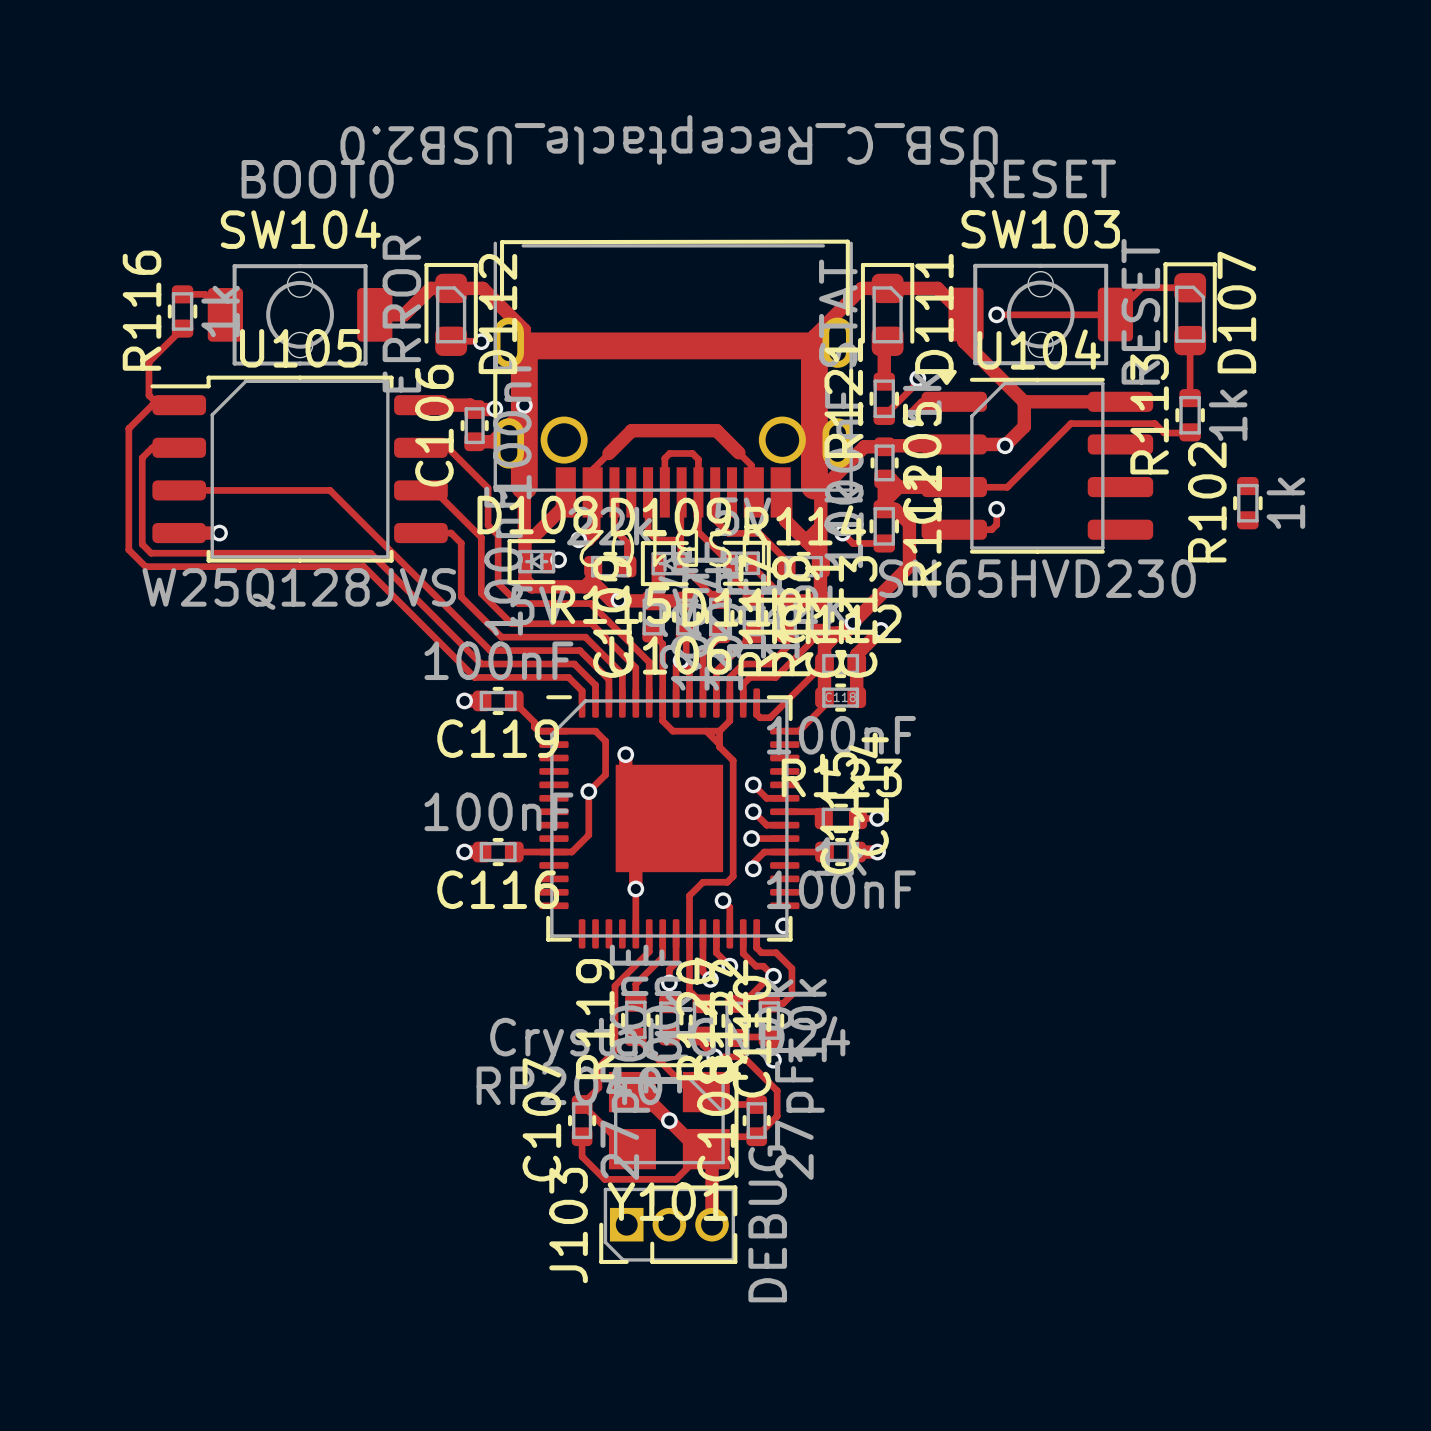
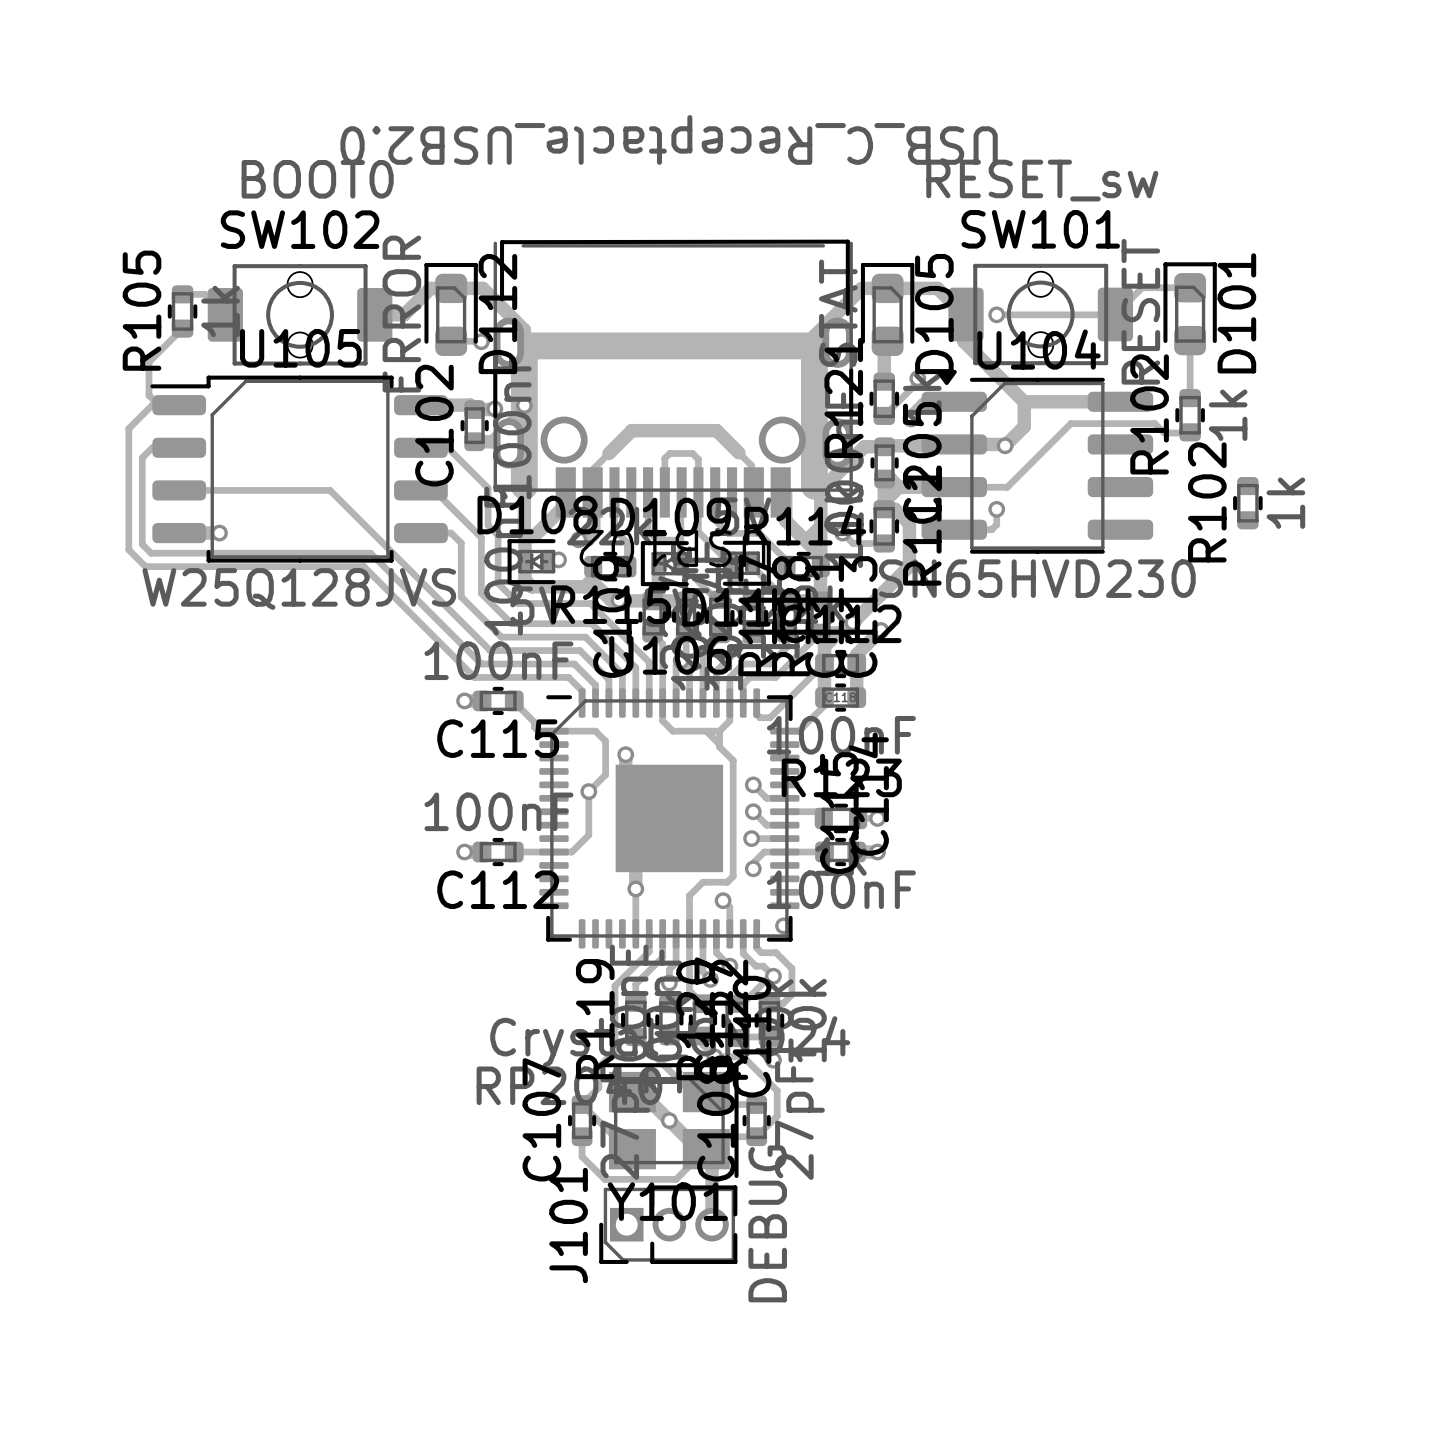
SW103 value: RESET (1043, 178) -> RESET_sw (1042, 180)
SW104 name: SW104 (300, 228) -> SW102 (300, 229)
SW103 name: SW103 (1040, 229) -> SW101 (1040, 229)
R116 name: R116 (142, 310) -> R105 (142, 310)
D107 name: D107 (1236, 312) -> D101 (1236, 313)
D111 name: D111 (934, 314) -> D105 (934, 314)
R113 name: R113 (1149, 414) -> R102 (1149, 414)
C106 name: C106 (434, 425) -> C102 (434, 425)
C119 name: C119 (498, 738) -> C115 (498, 738)
C116 name: C116 (498, 889) -> C112 (498, 889)
J103 name: J103 (568, 1225) -> J101 (568, 1225)

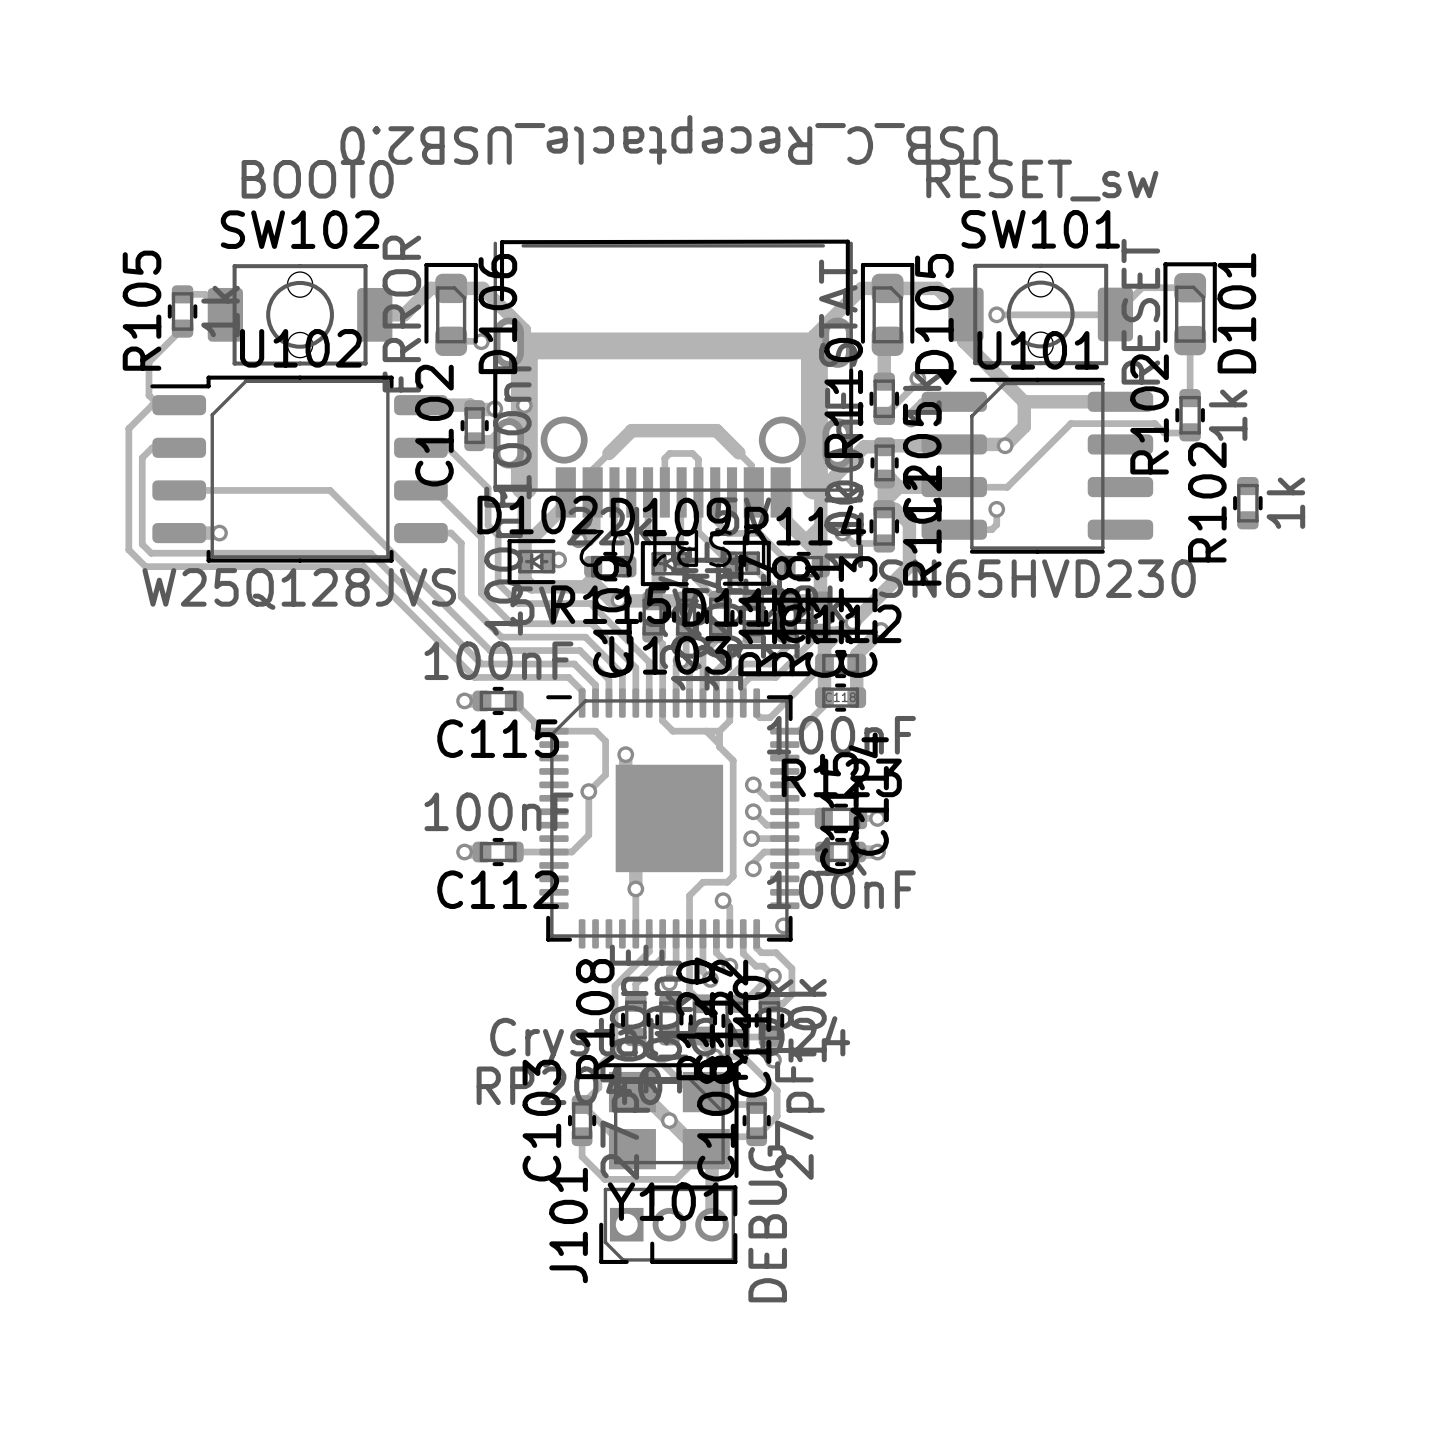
D112 name: D112 (497, 314) -> D106 (497, 314)
U105 name: U105 (300, 348) -> U102 (300, 348)
U104 name: U104 (1038, 349) -> U101 (1038, 350)
R121 name: R121 (843, 397) -> R110 (843, 397)
D108 name: D108 (537, 515) -> D102 (537, 515)
U106 name: U106 (670, 655) -> U103 (670, 655)
R119 name: R119 (595, 1019) -> R108 (595, 1019)
C107 name: C107 (541, 1119) -> C103 (541, 1120)

